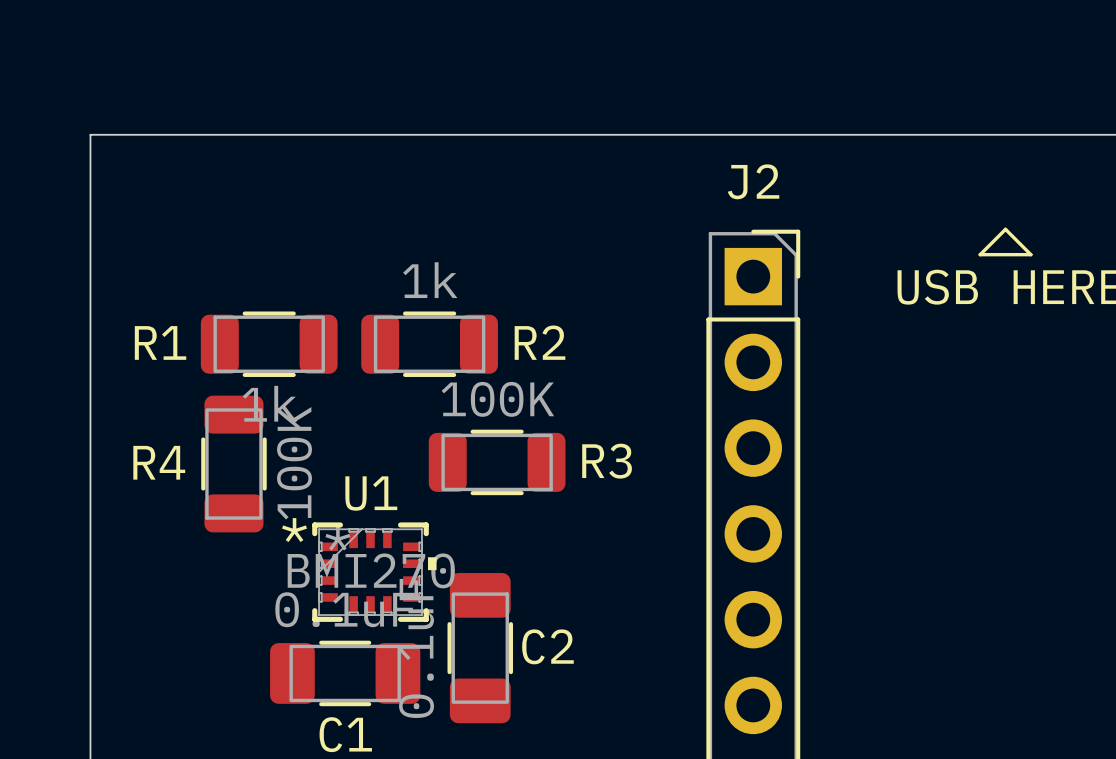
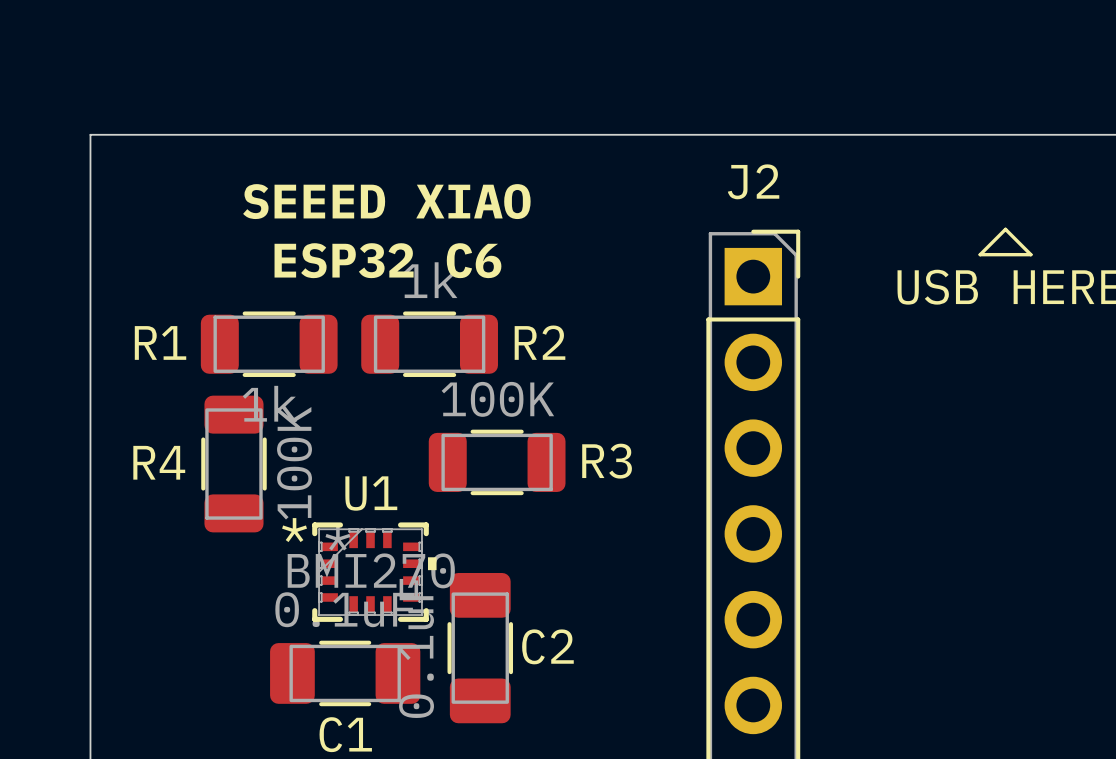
text: none -> SEEED XIAO (386, 201)
text: none -> ESP32 C6 (387, 260)

